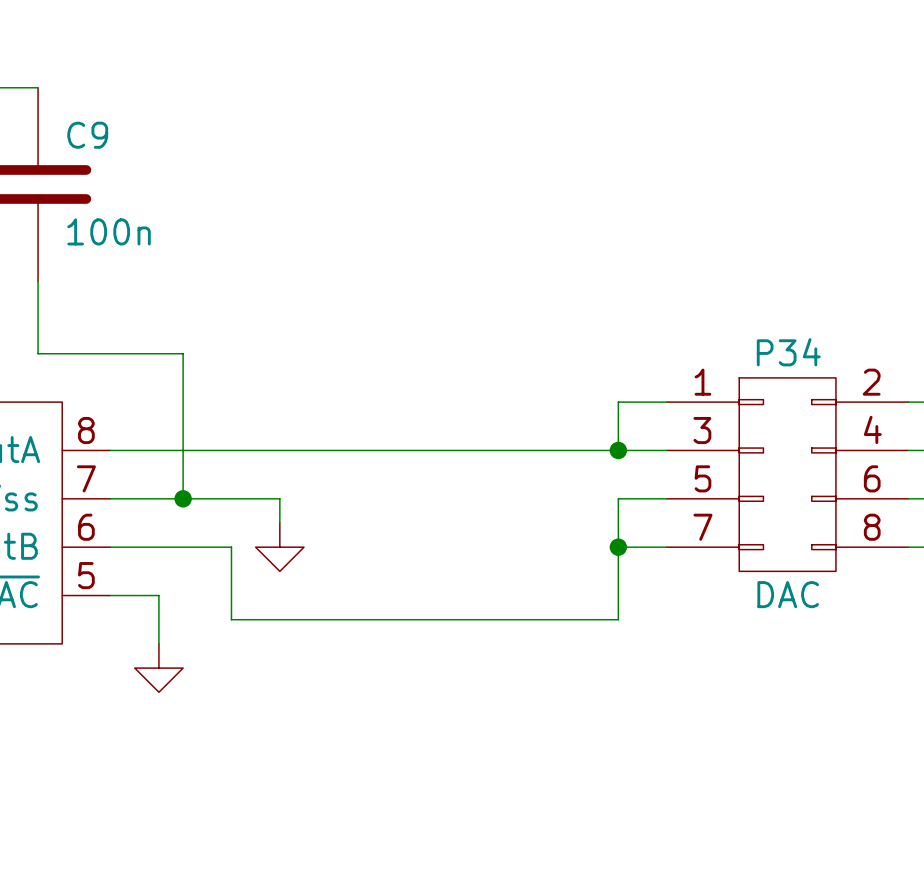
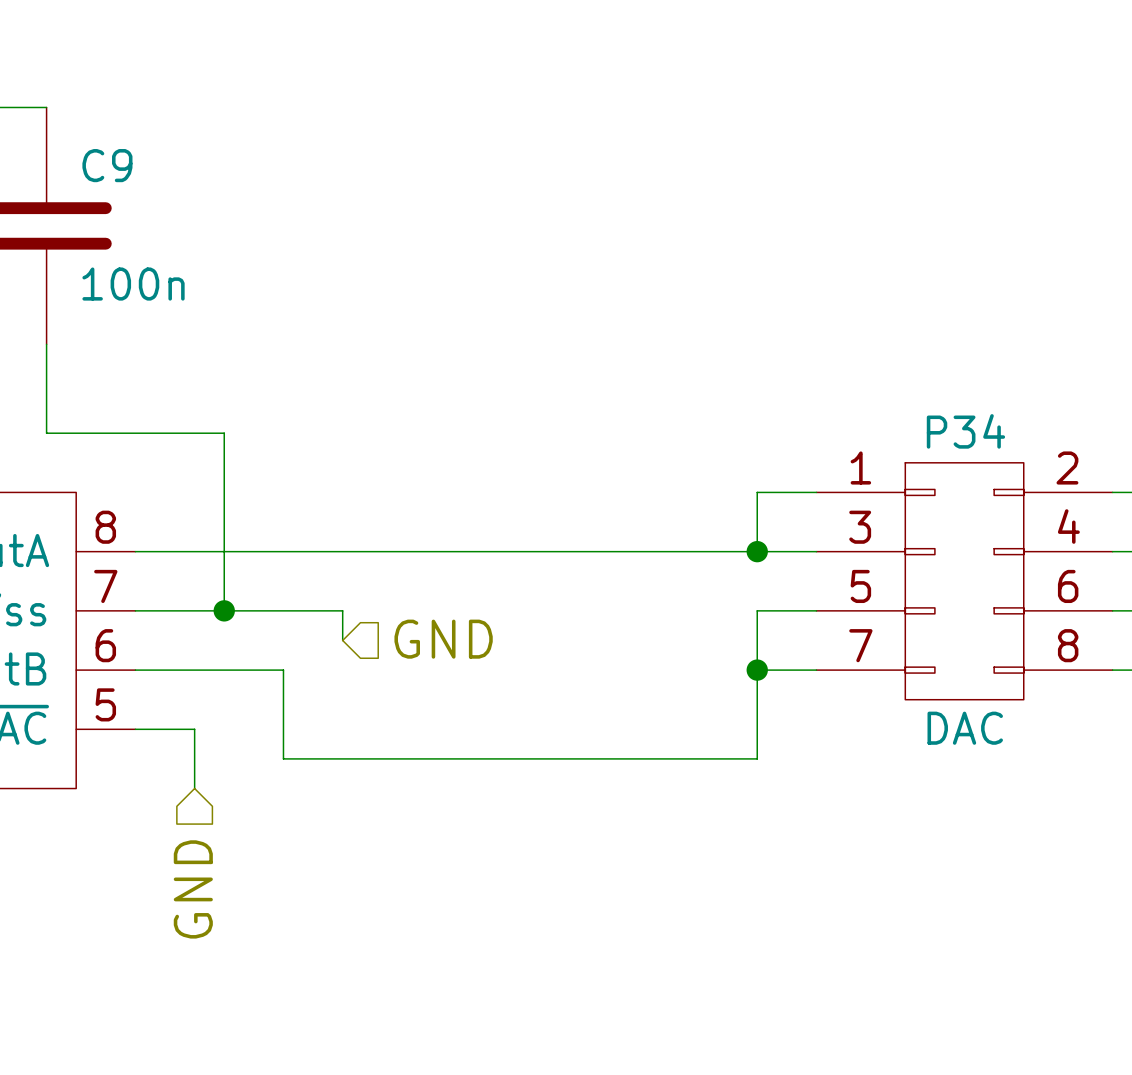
hierarchical label: none -> GND (443, 639)
power symbol: (279, 547) -> none
power symbol: (158, 668) -> none
hierarchical label: none -> GND (193, 889)

